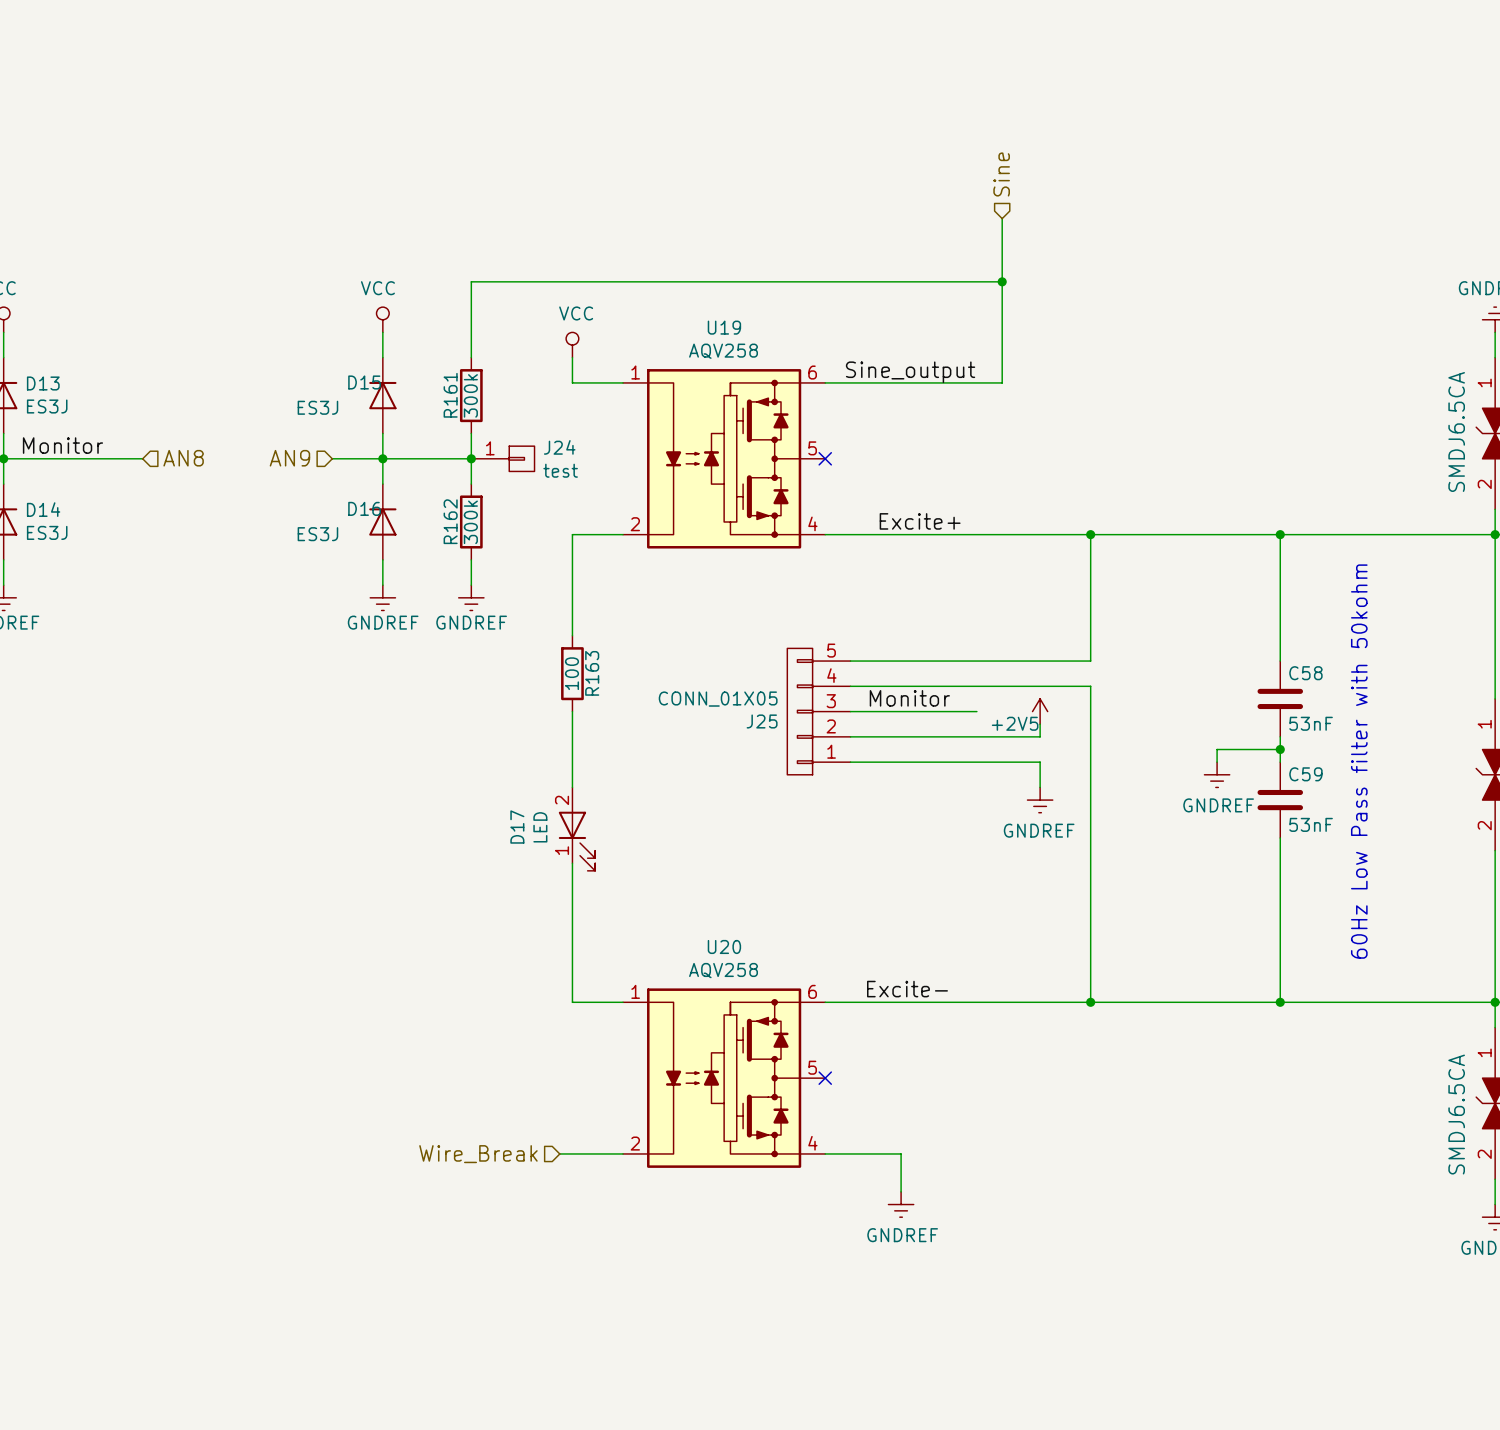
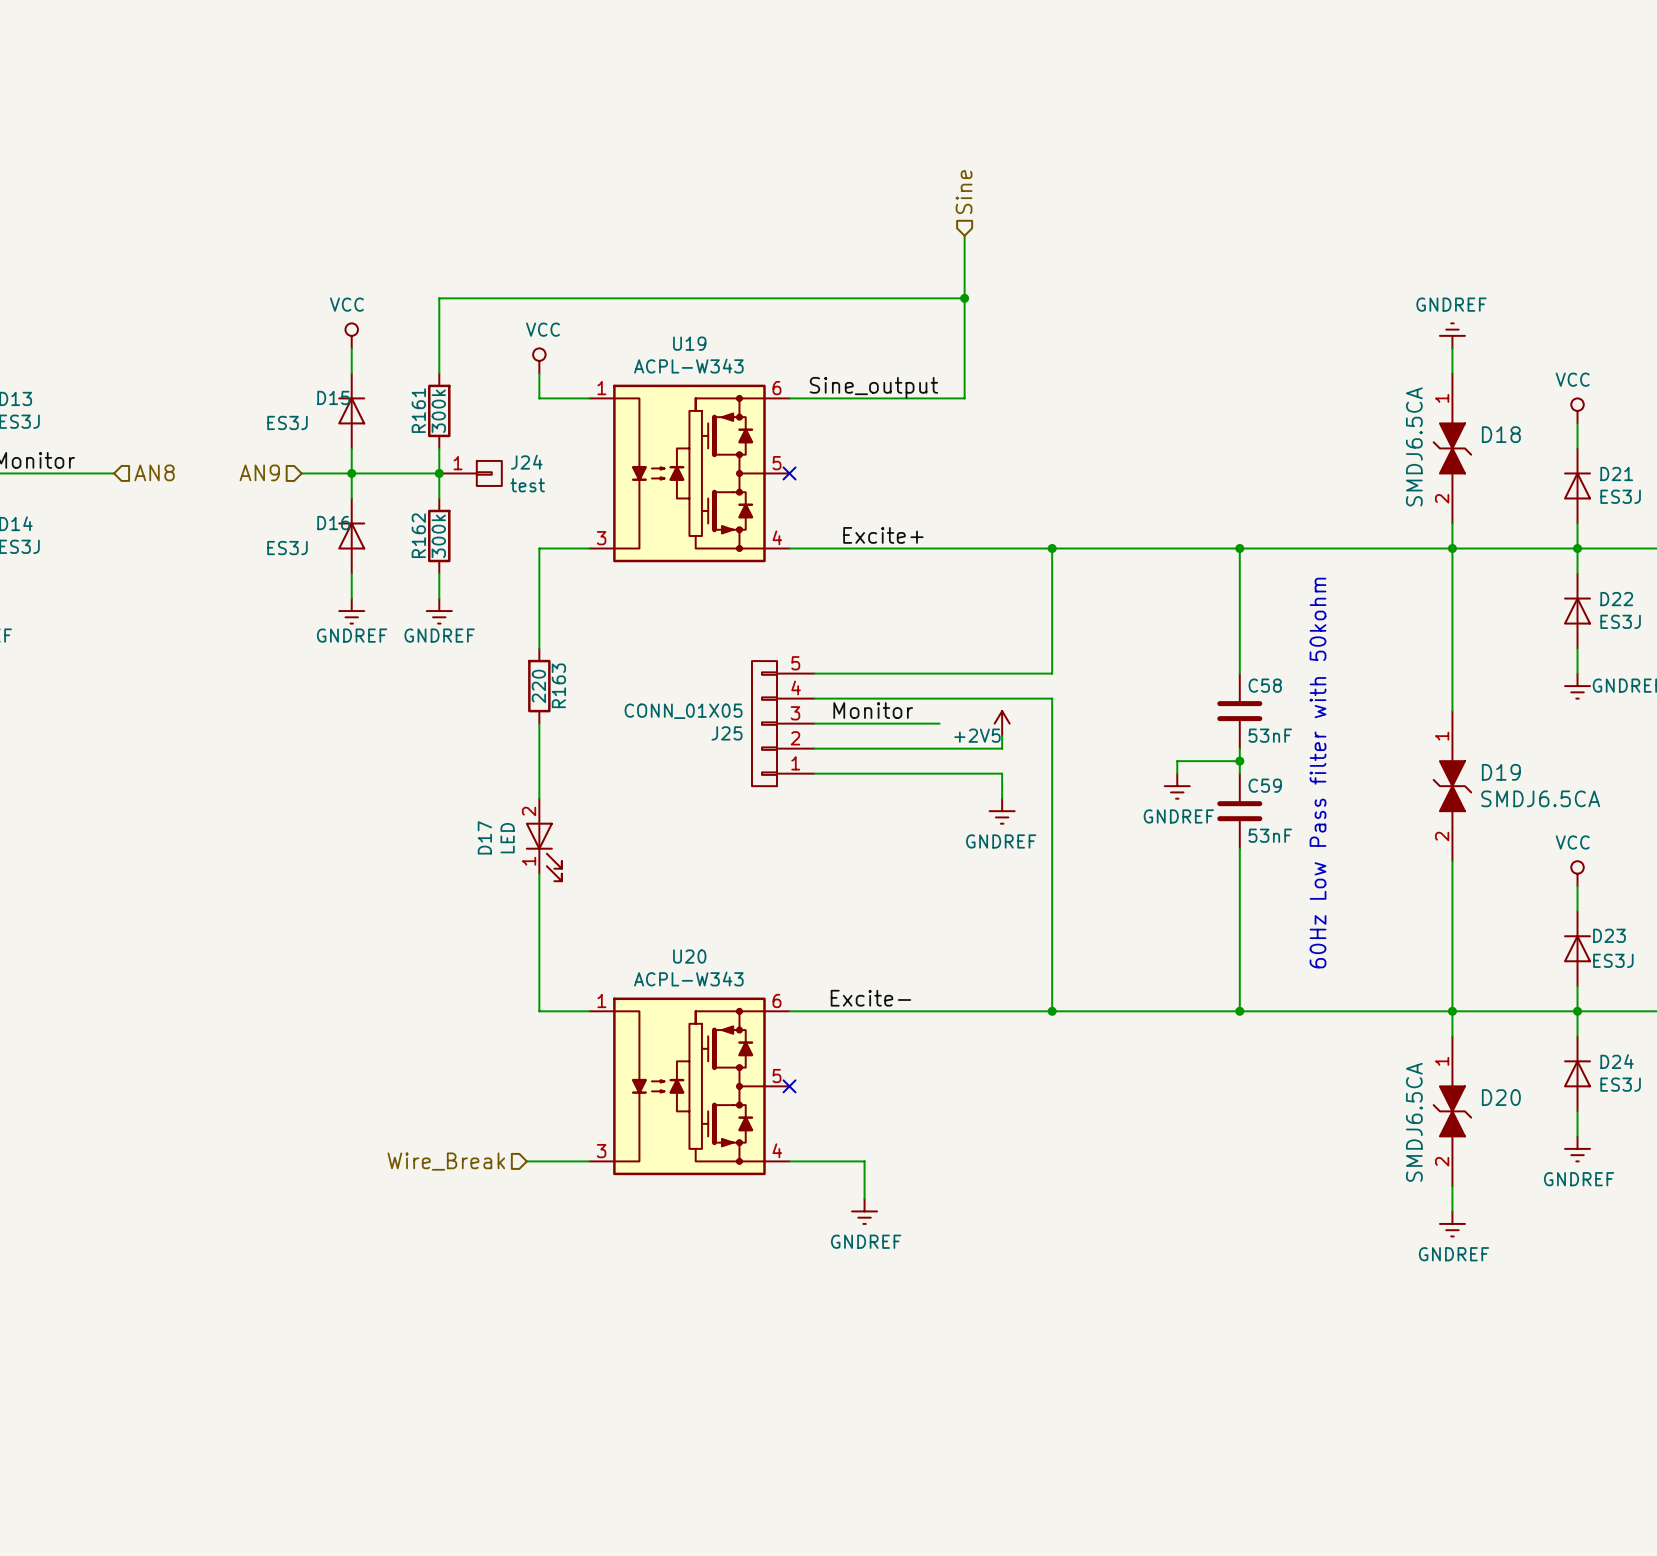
U19 value: AQV258 (723, 351) -> ACPL-W343 (688, 366)
U19 pin number: 2 (635, 524) -> 3 (601, 538)
R163 value: 100 (571, 673) -> 220 (538, 686)
U20 value: AQV258 (723, 970) -> ACPL-W343 (688, 979)
U20 pin number: 2 (635, 1143) -> 3 (601, 1151)

